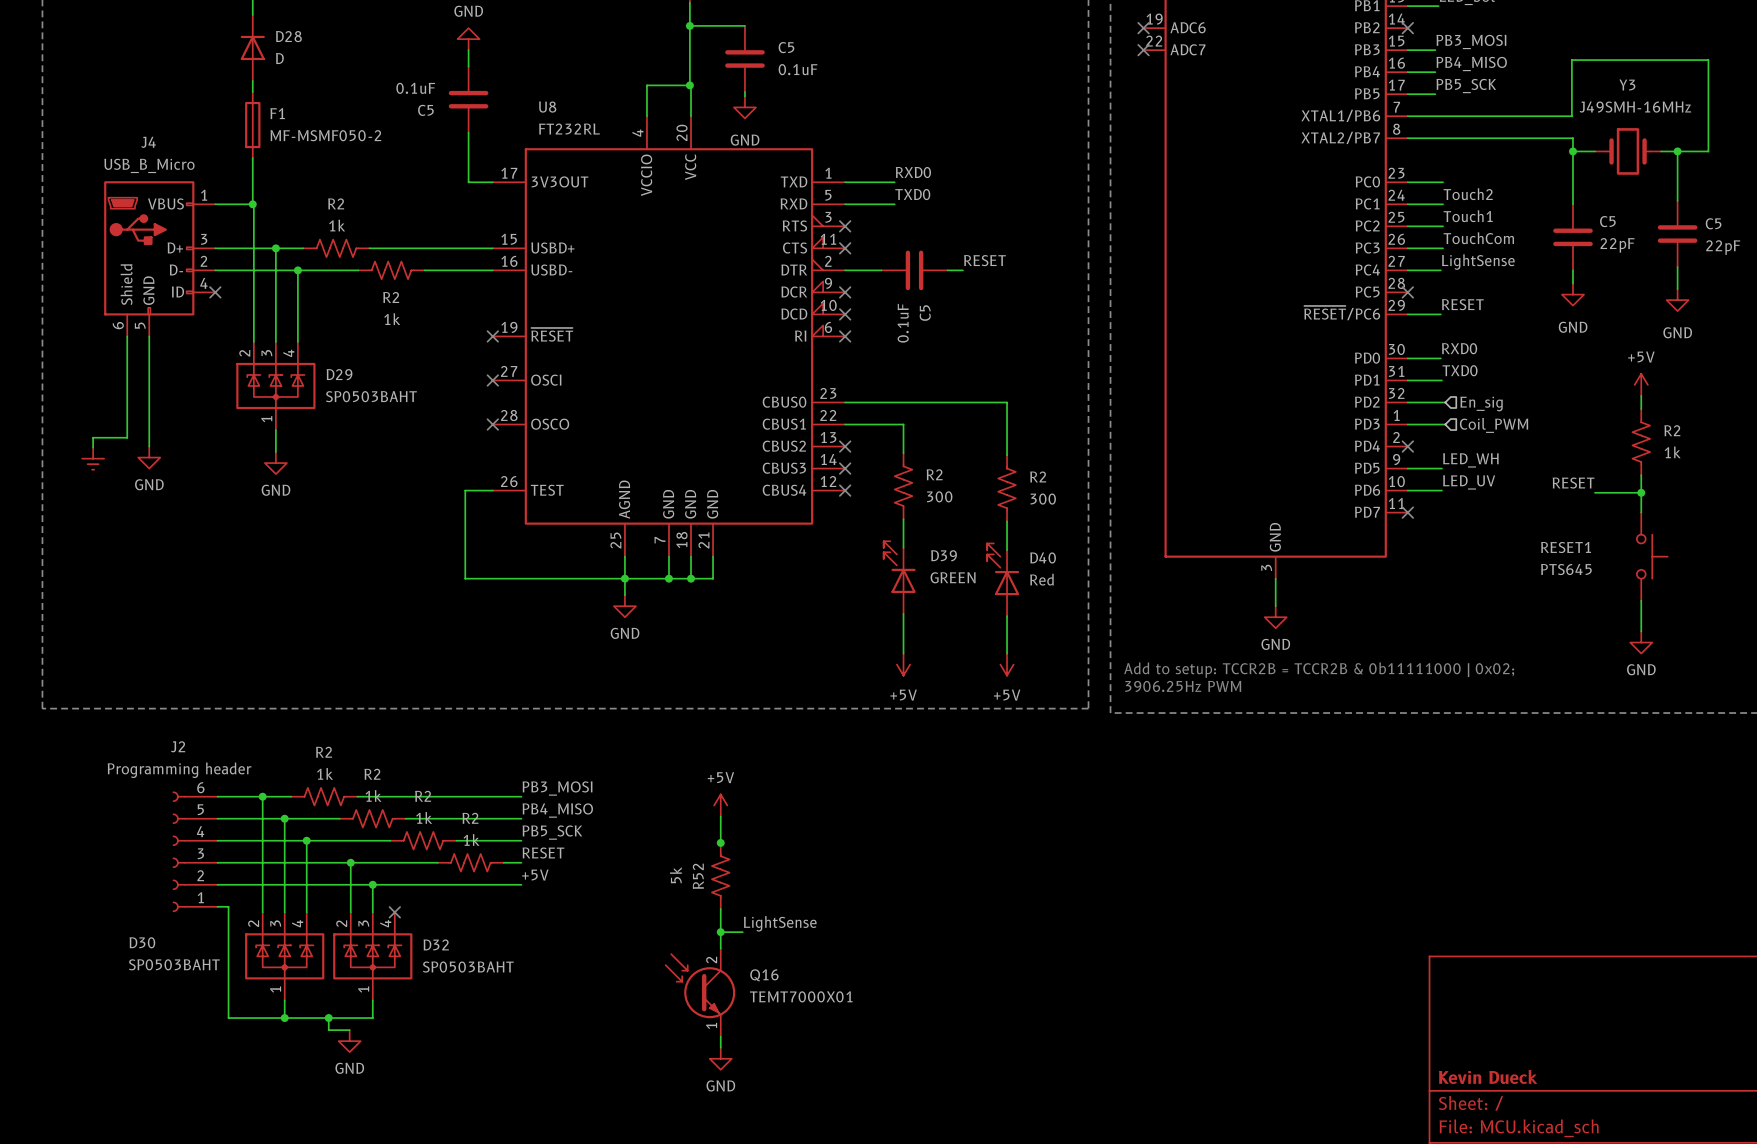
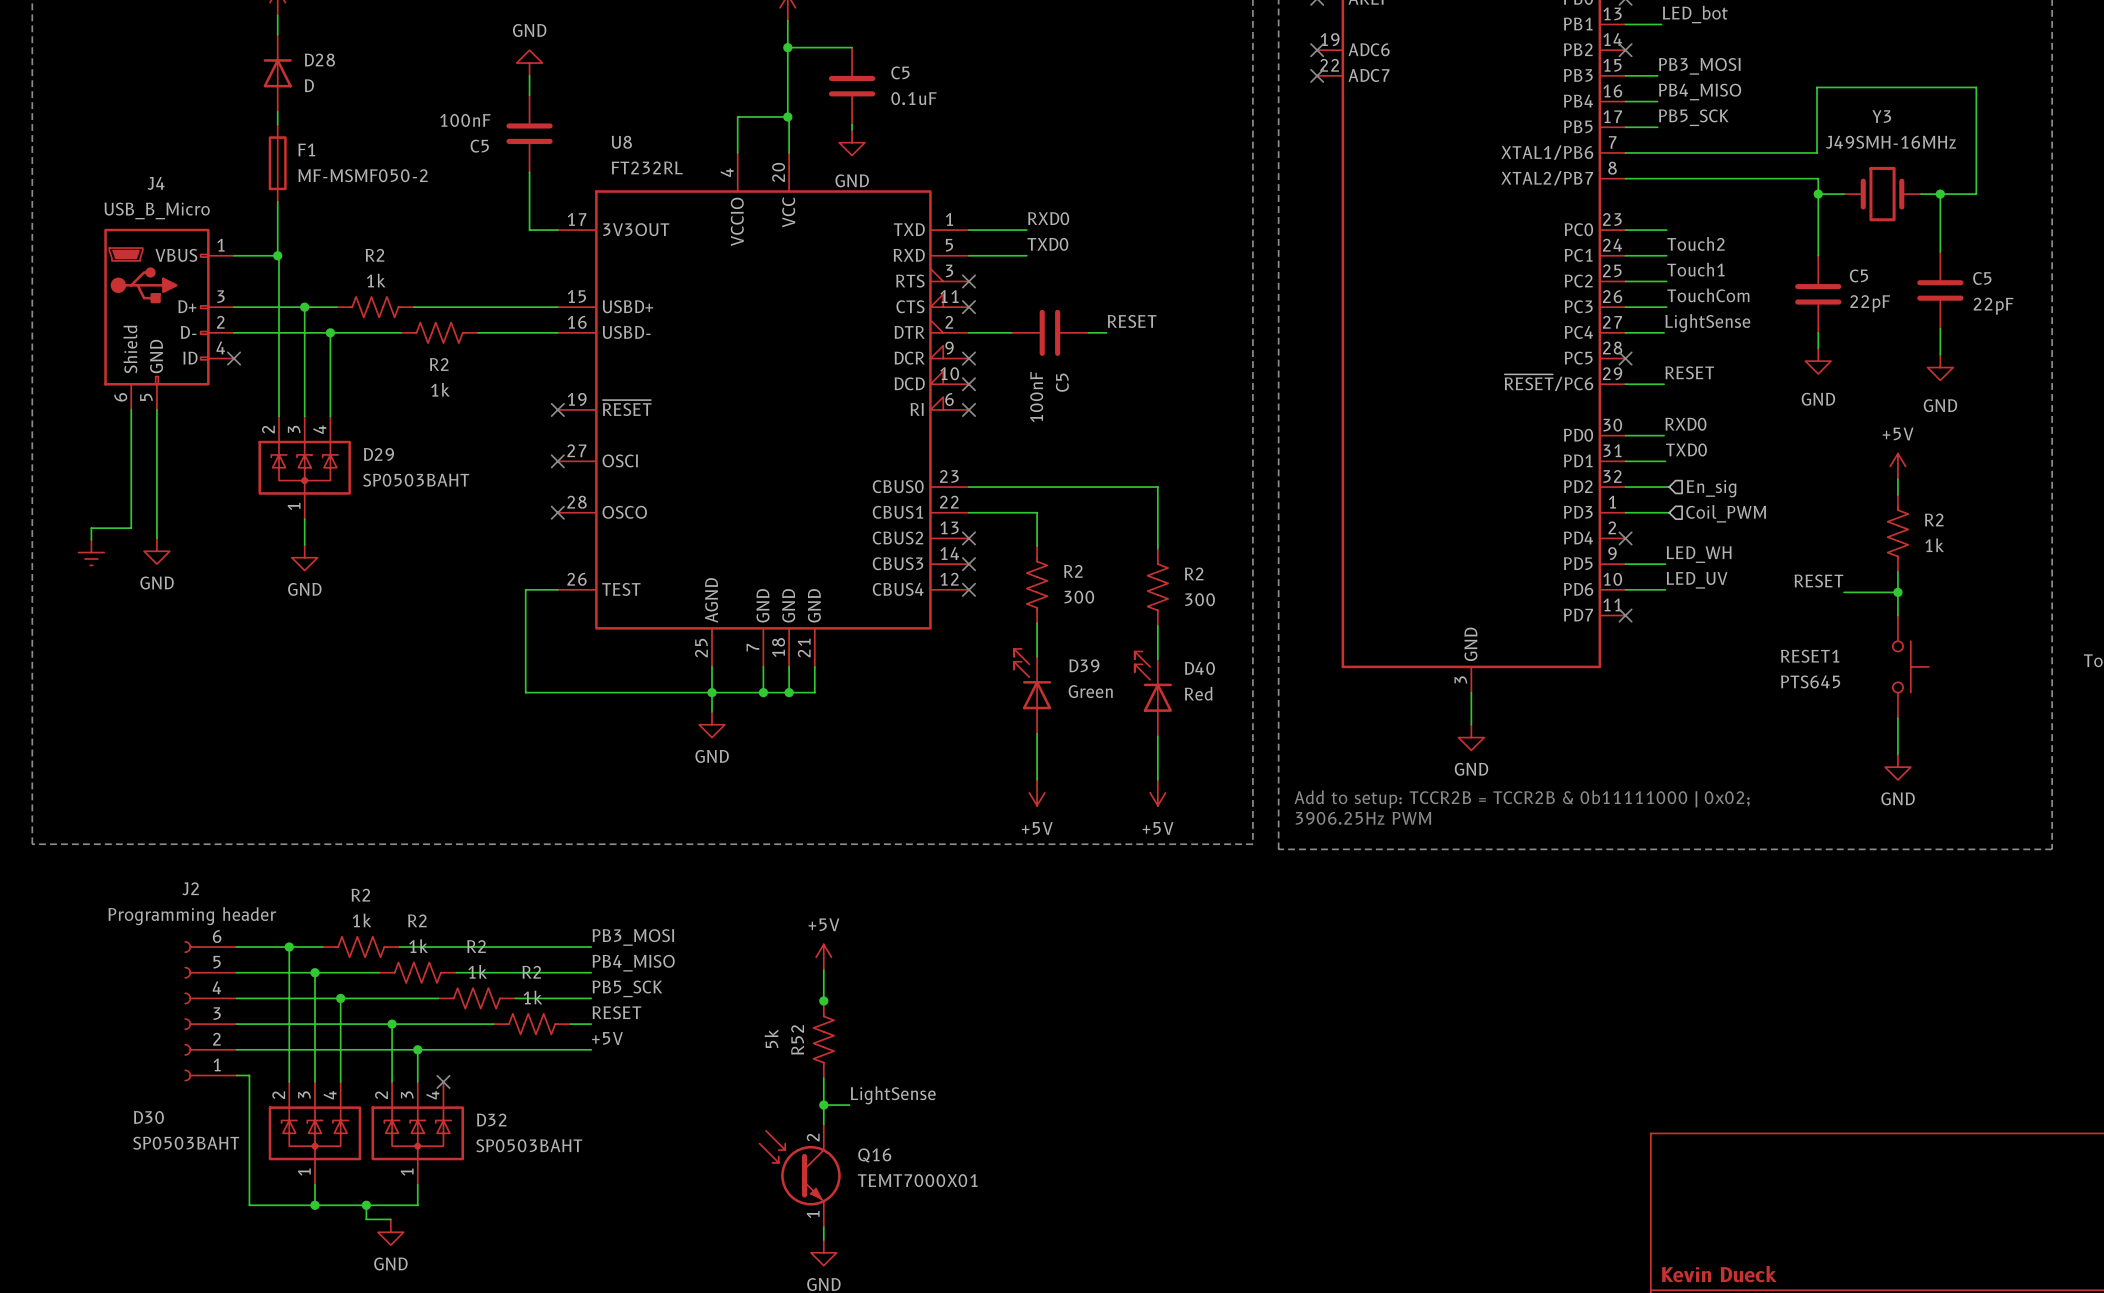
C5 value: 0.1uF (415, 88) -> 100nF (465, 120)
C5 value: 0.1uF (903, 323) -> 100nF (1036, 397)
D39 value: GREEN (953, 577) -> Green (1090, 691)

